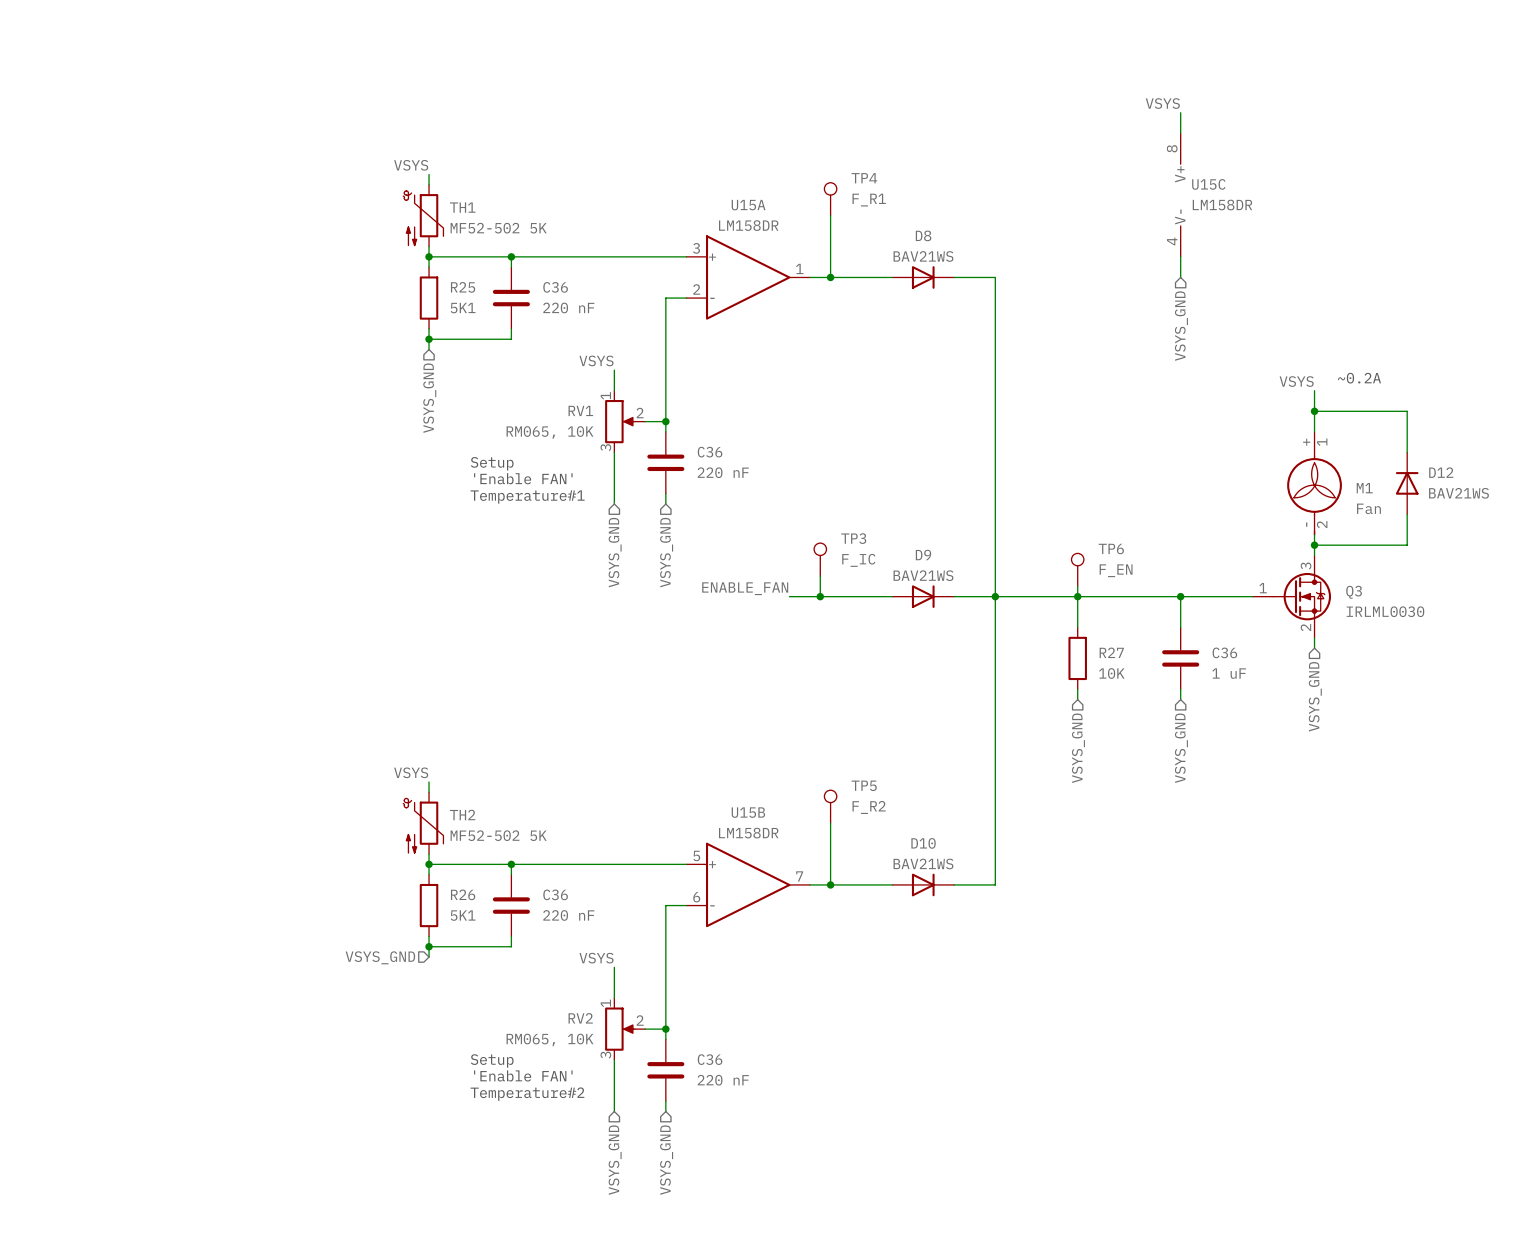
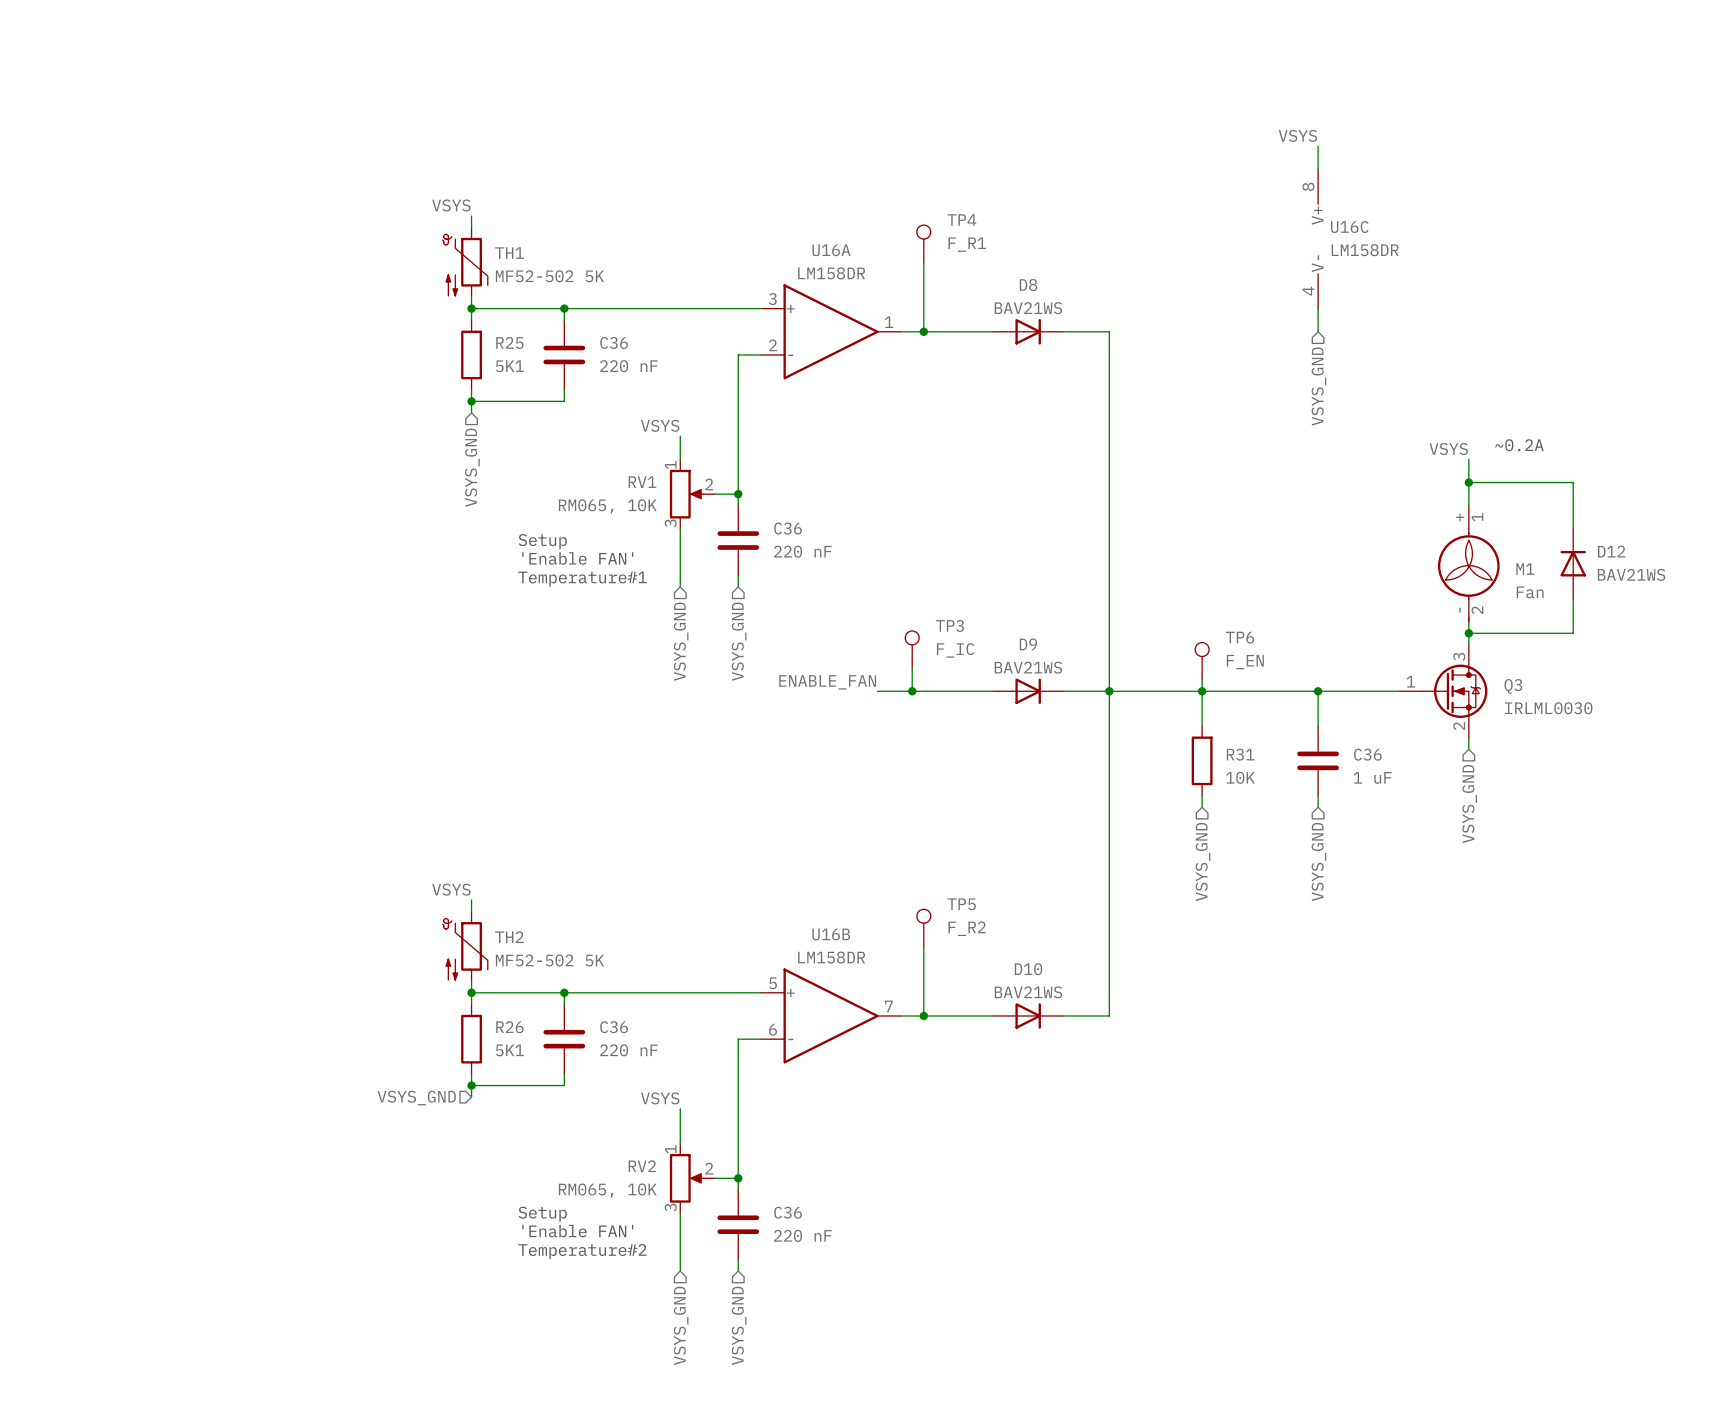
U15C name: U15C (1208, 184) -> U16C (1349, 227)
U15A name: U15A (748, 205) -> U16A (831, 250)
R27 name: R27 (1111, 652) -> R31 (1240, 754)
U15B name: U15B (748, 812) -> U16B (831, 934)

